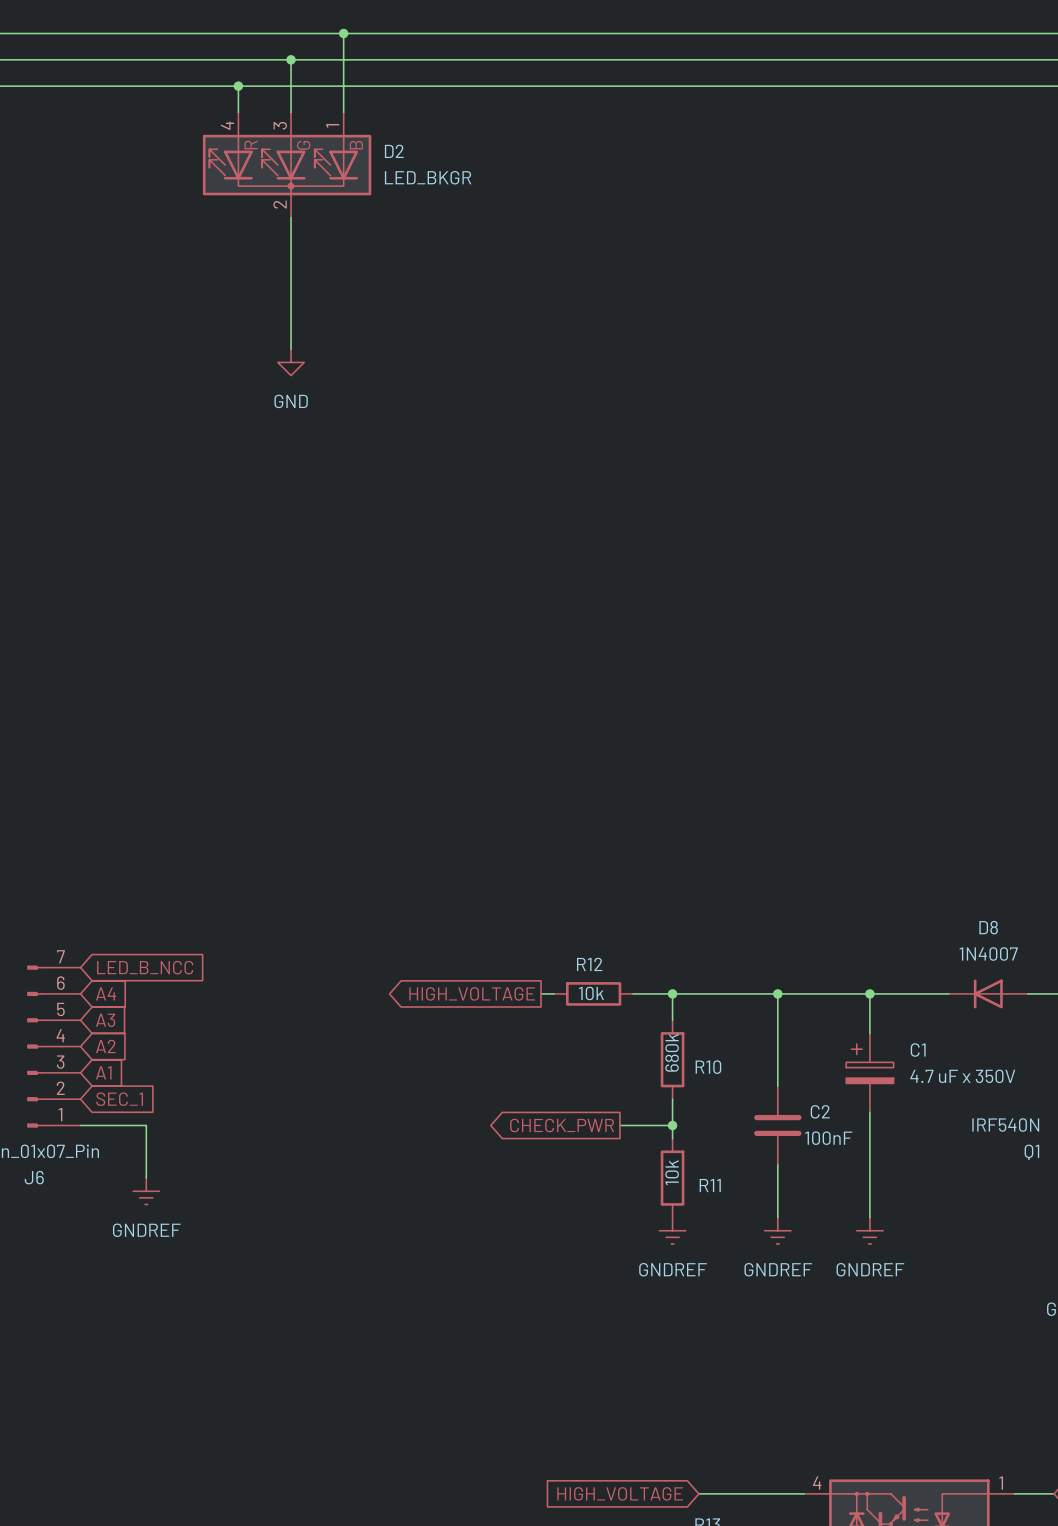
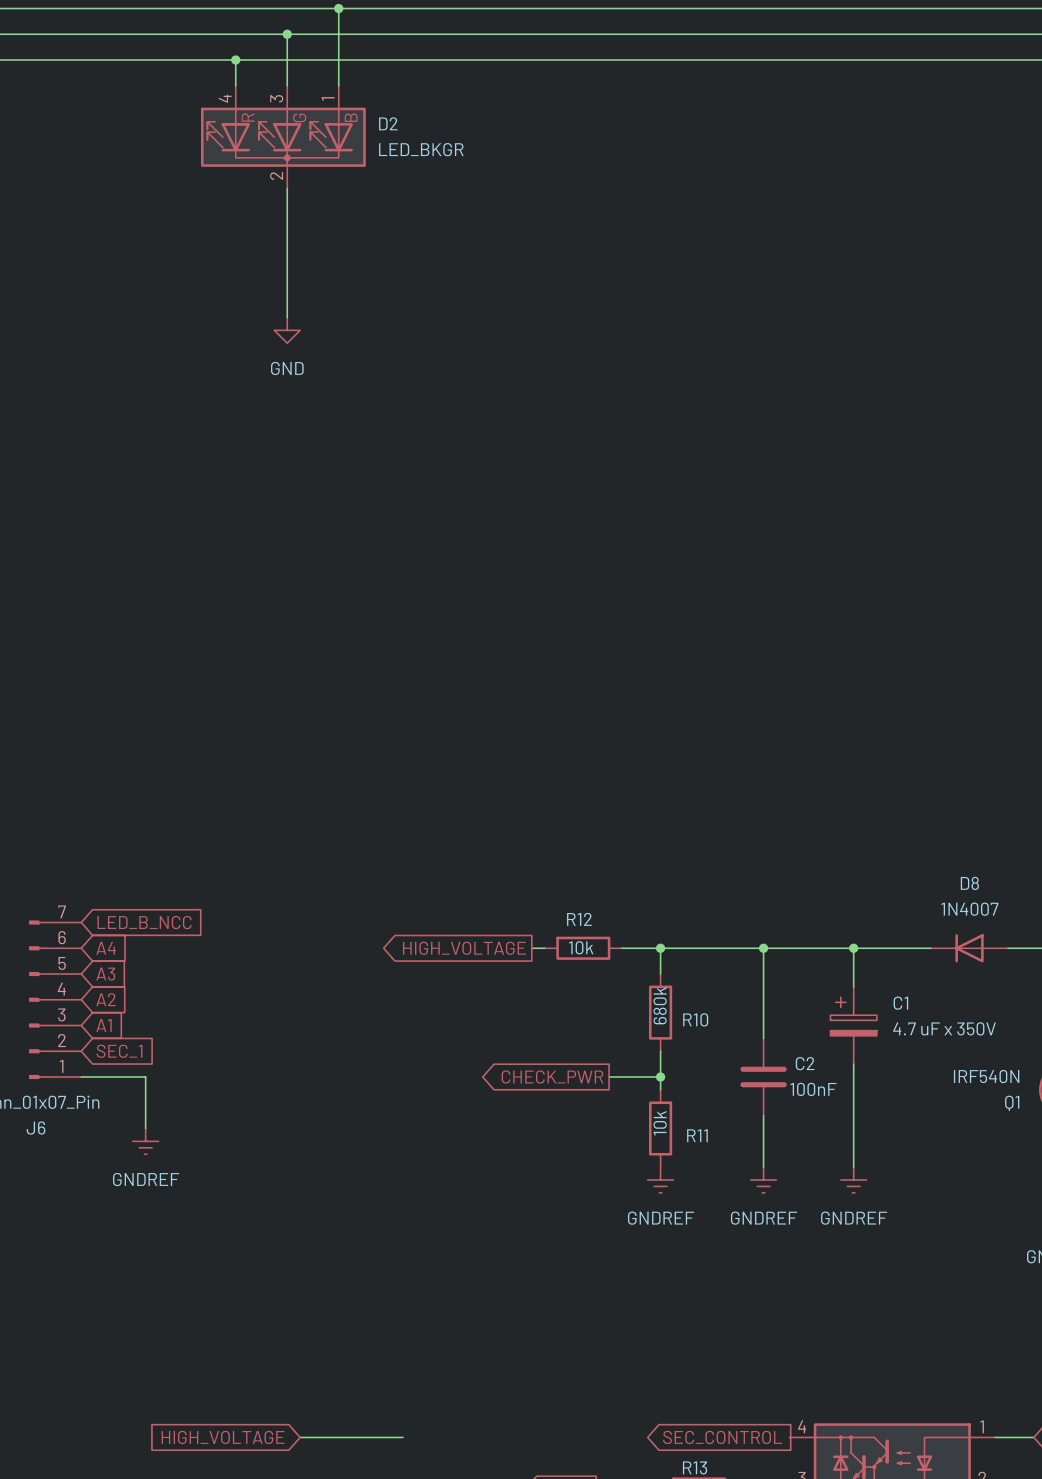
global label: none -> HIGH_VOLTAGE (223, 1437)
wire: none -> (300, 1437) (403, 1437)
global label: HIGH_VOLTAGE (620, 1493) -> none
wire: (698, 1493) (804, 1493) -> none
global label: none -> SEC_CONTROL (722, 1437)

